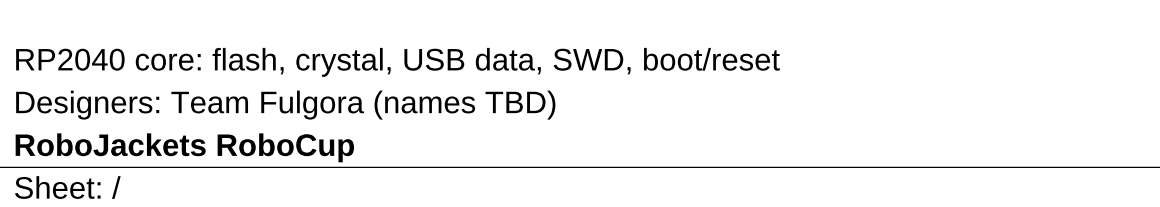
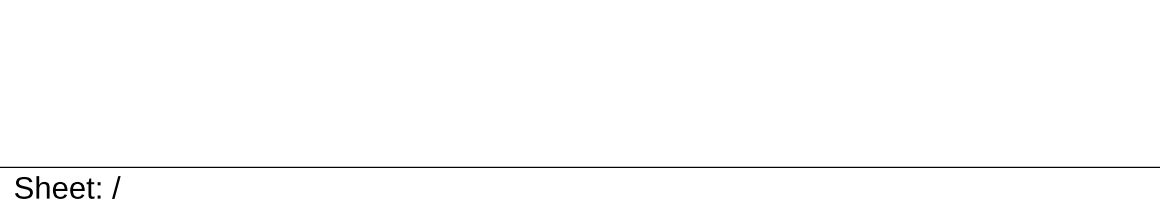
title block: RP2040 core: flash, crystal, USB data, SWD, boot/reset (398, 62) -> none
title block: Designers: Team Fulgora (names TBD) (285, 105) -> none
title block: RoboJackets RoboCup (184, 147) -> none

